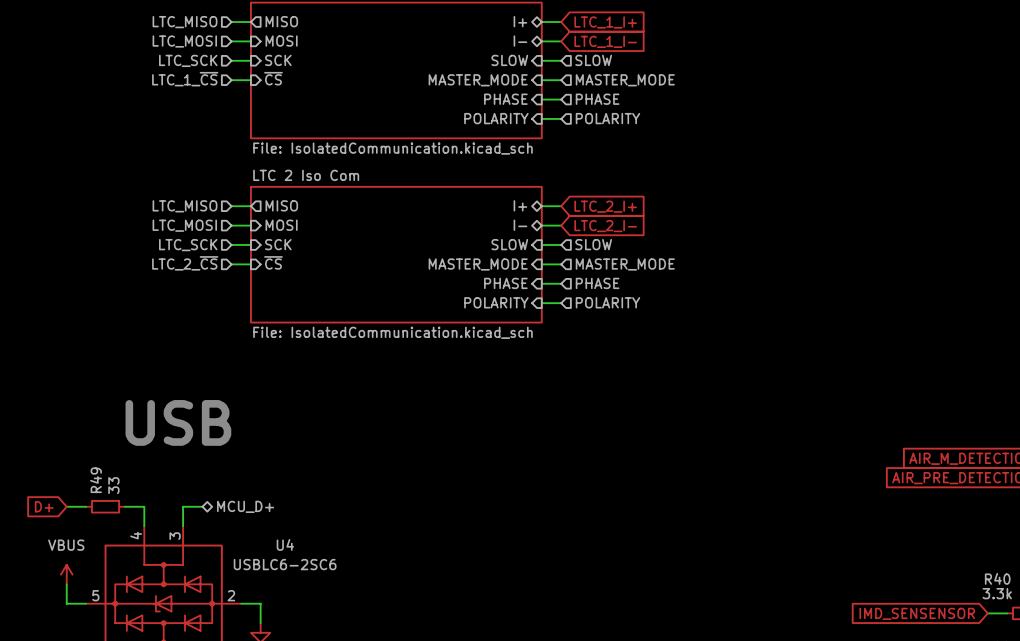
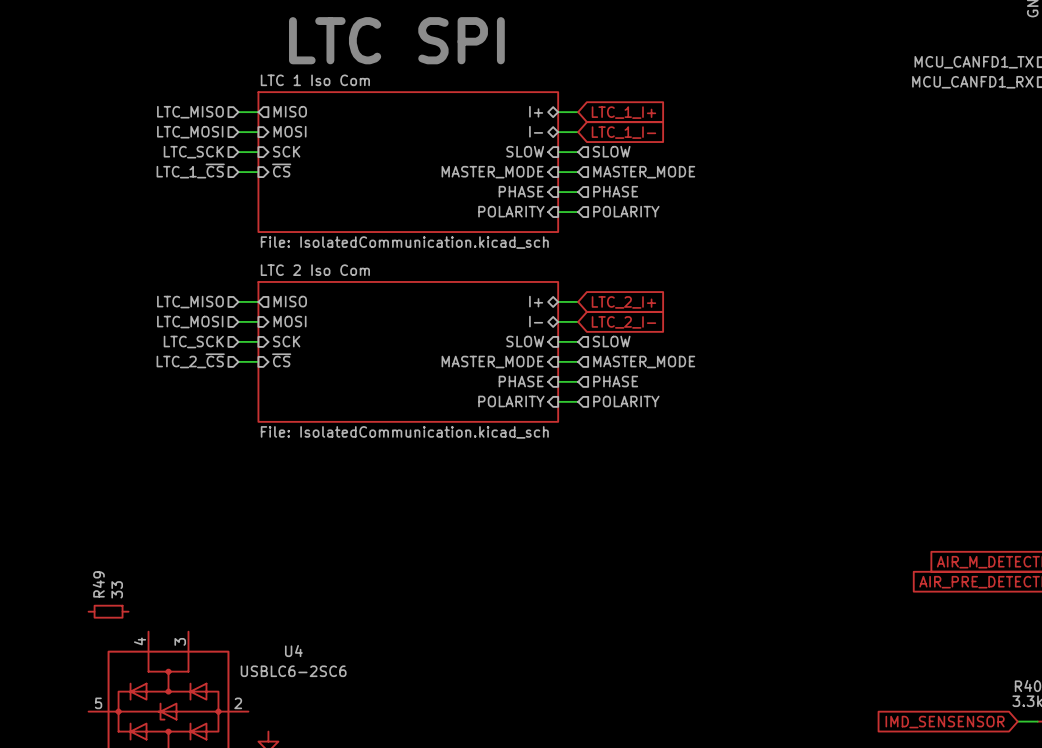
text: USB (178, 422) -> none
global label: D+ (44, 506) -> none
wire: (66, 506) (86, 506) -> none
wire: (124, 506) (144, 506) (144, 526) -> none
wire: (202, 506) (183, 506) (183, 526) -> none
hierarchical label: MCU_D+ (245, 506) -> none
power symbol: VBUS (66, 574) -> none
wire: (66, 584) (66, 603) (86, 603) -> none
wire: (241, 603) (260, 603) (260, 623) -> none

